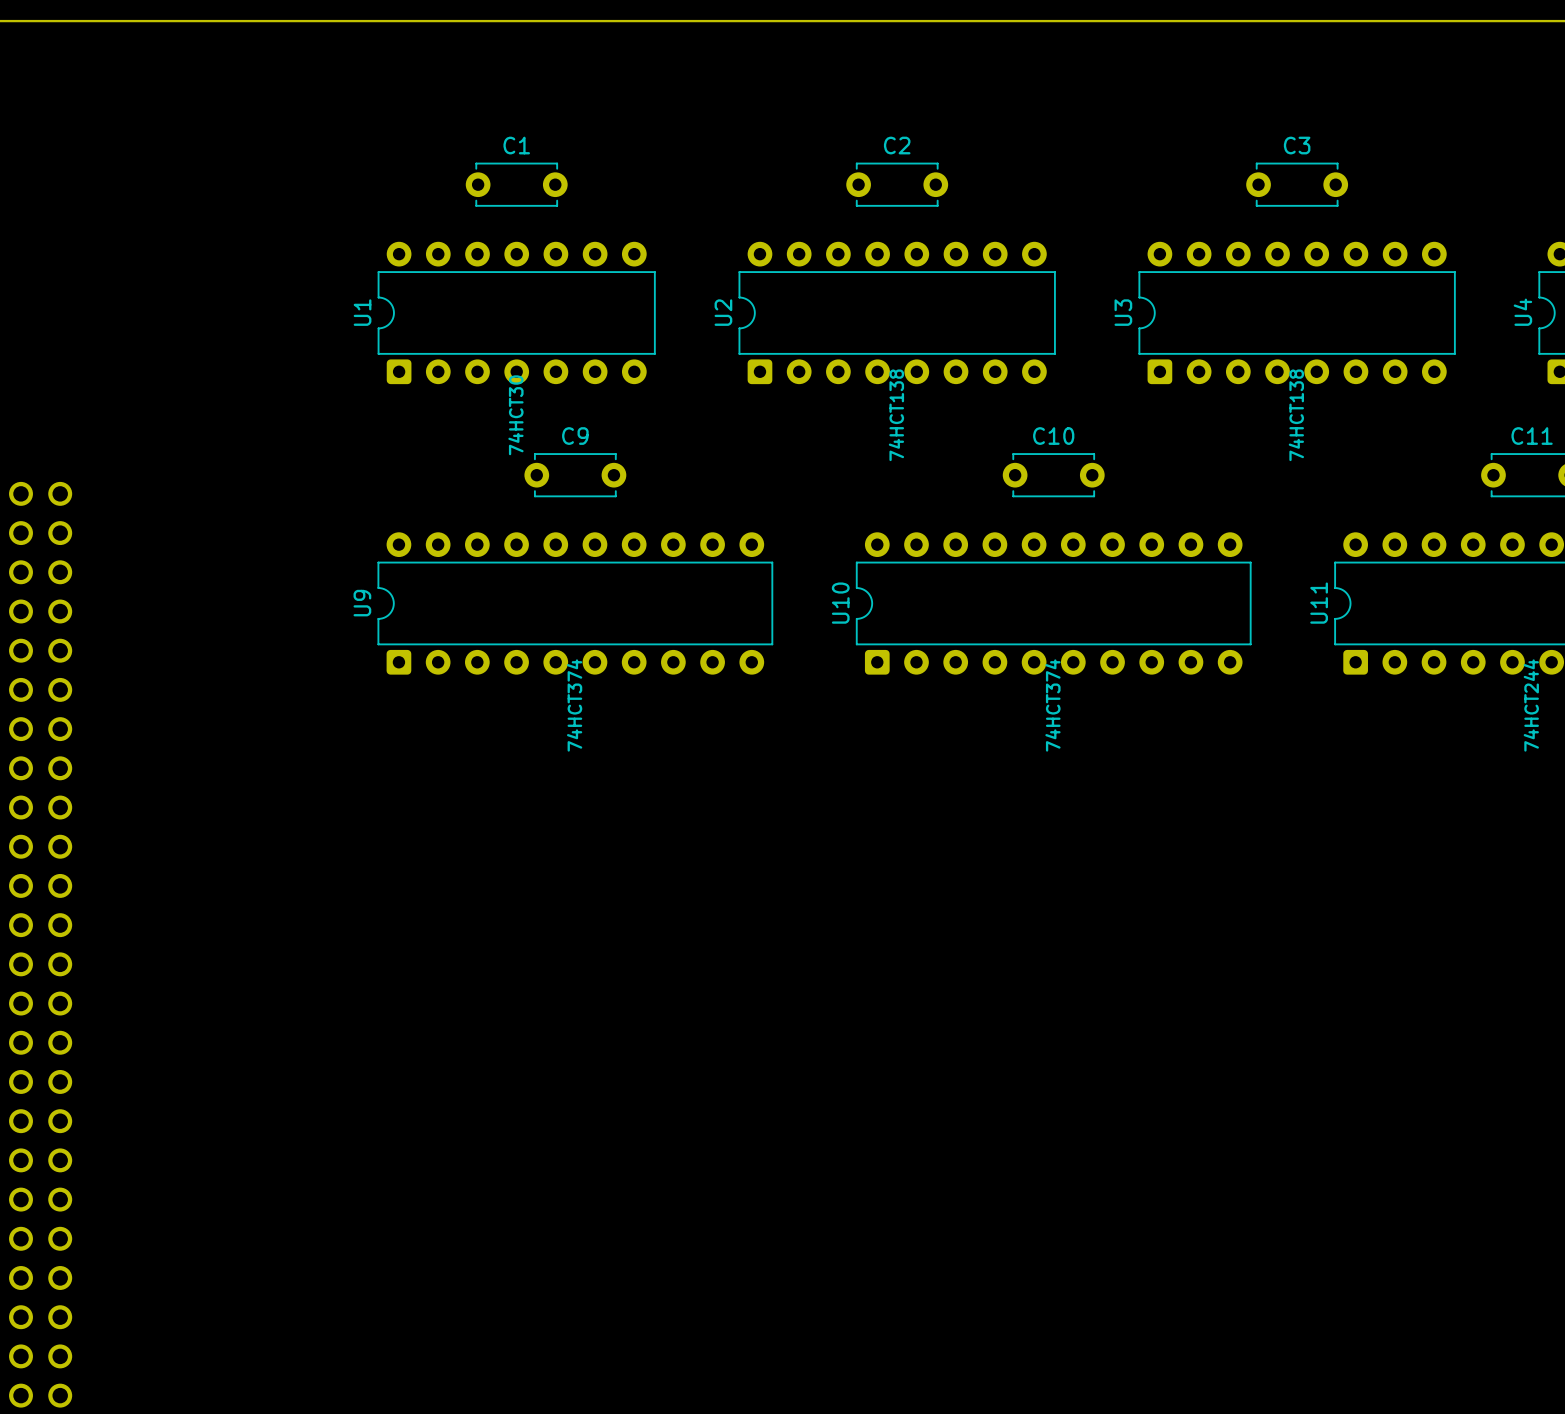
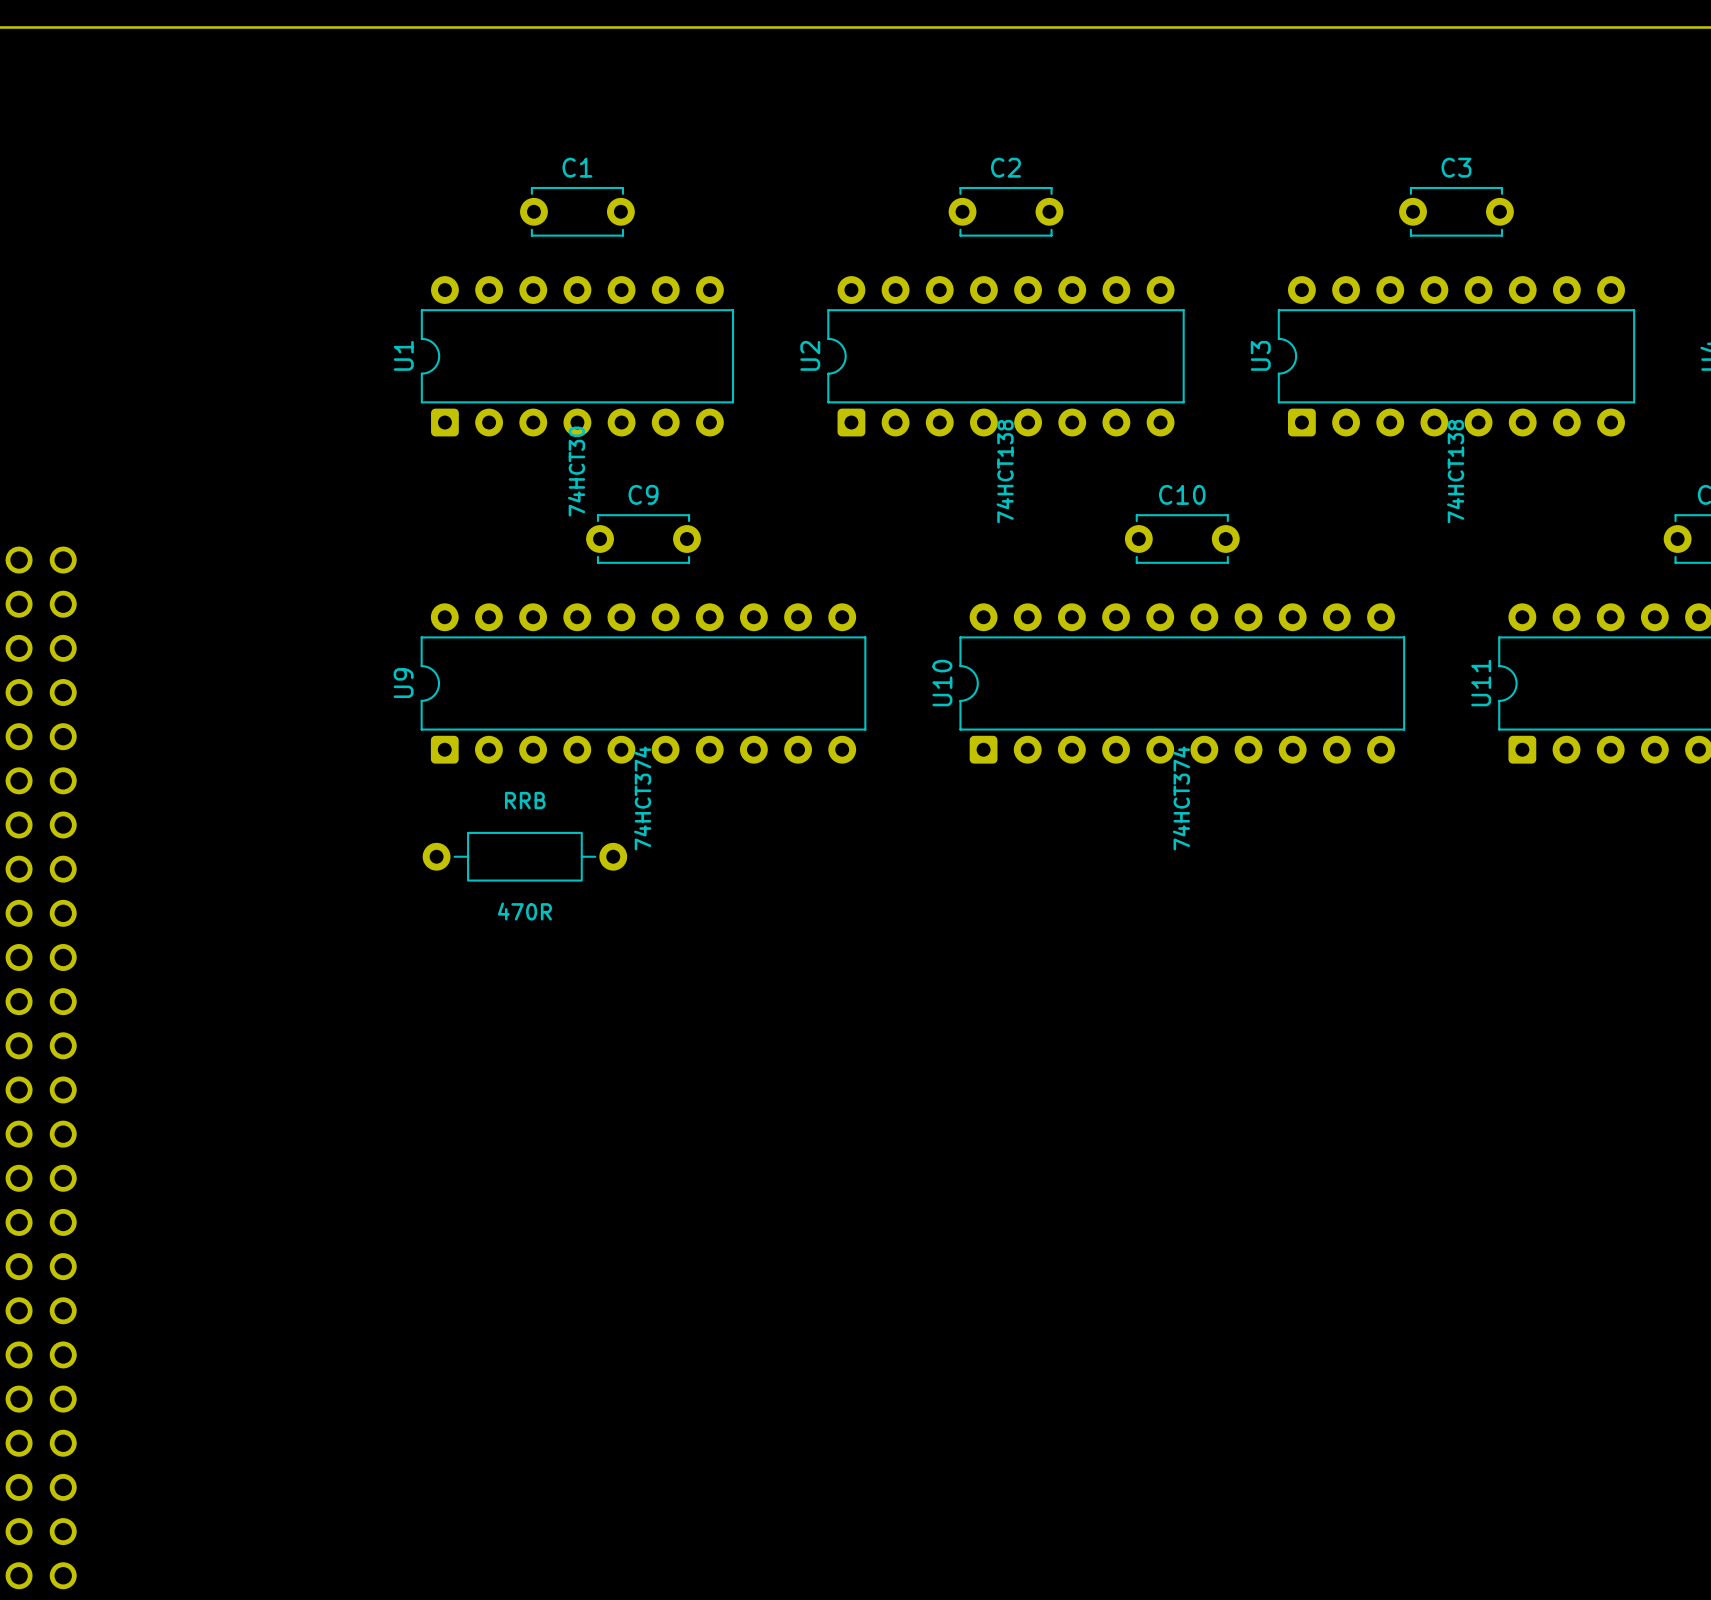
RRB: none -> 470R (524, 856)

